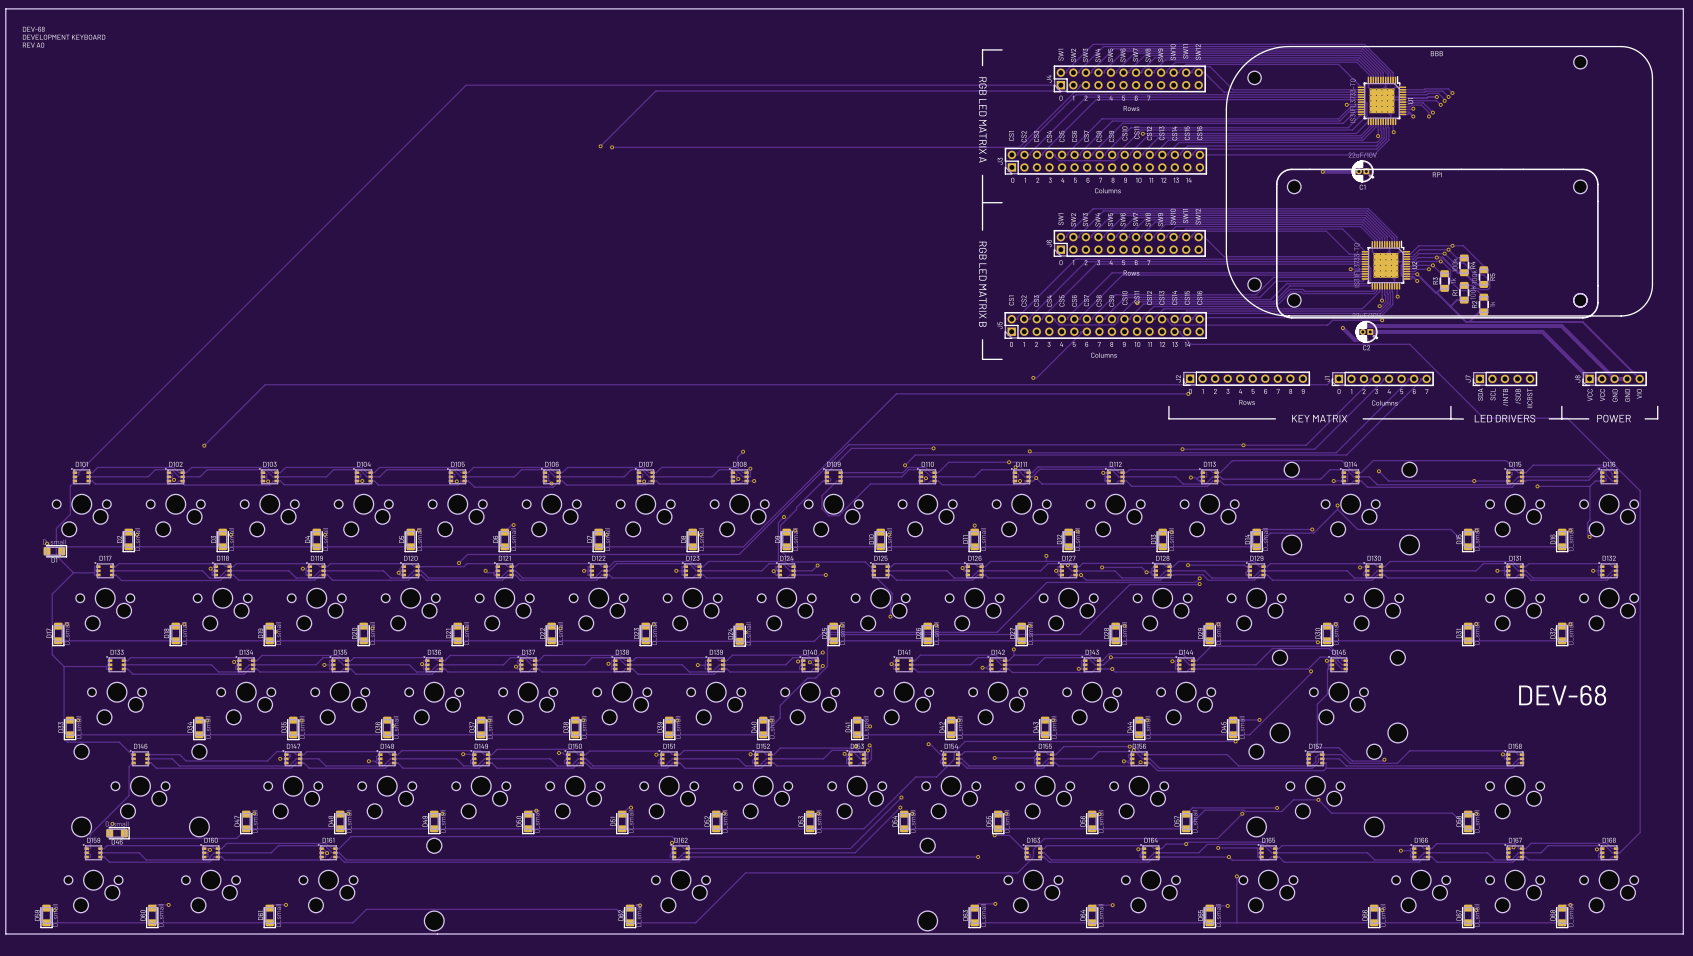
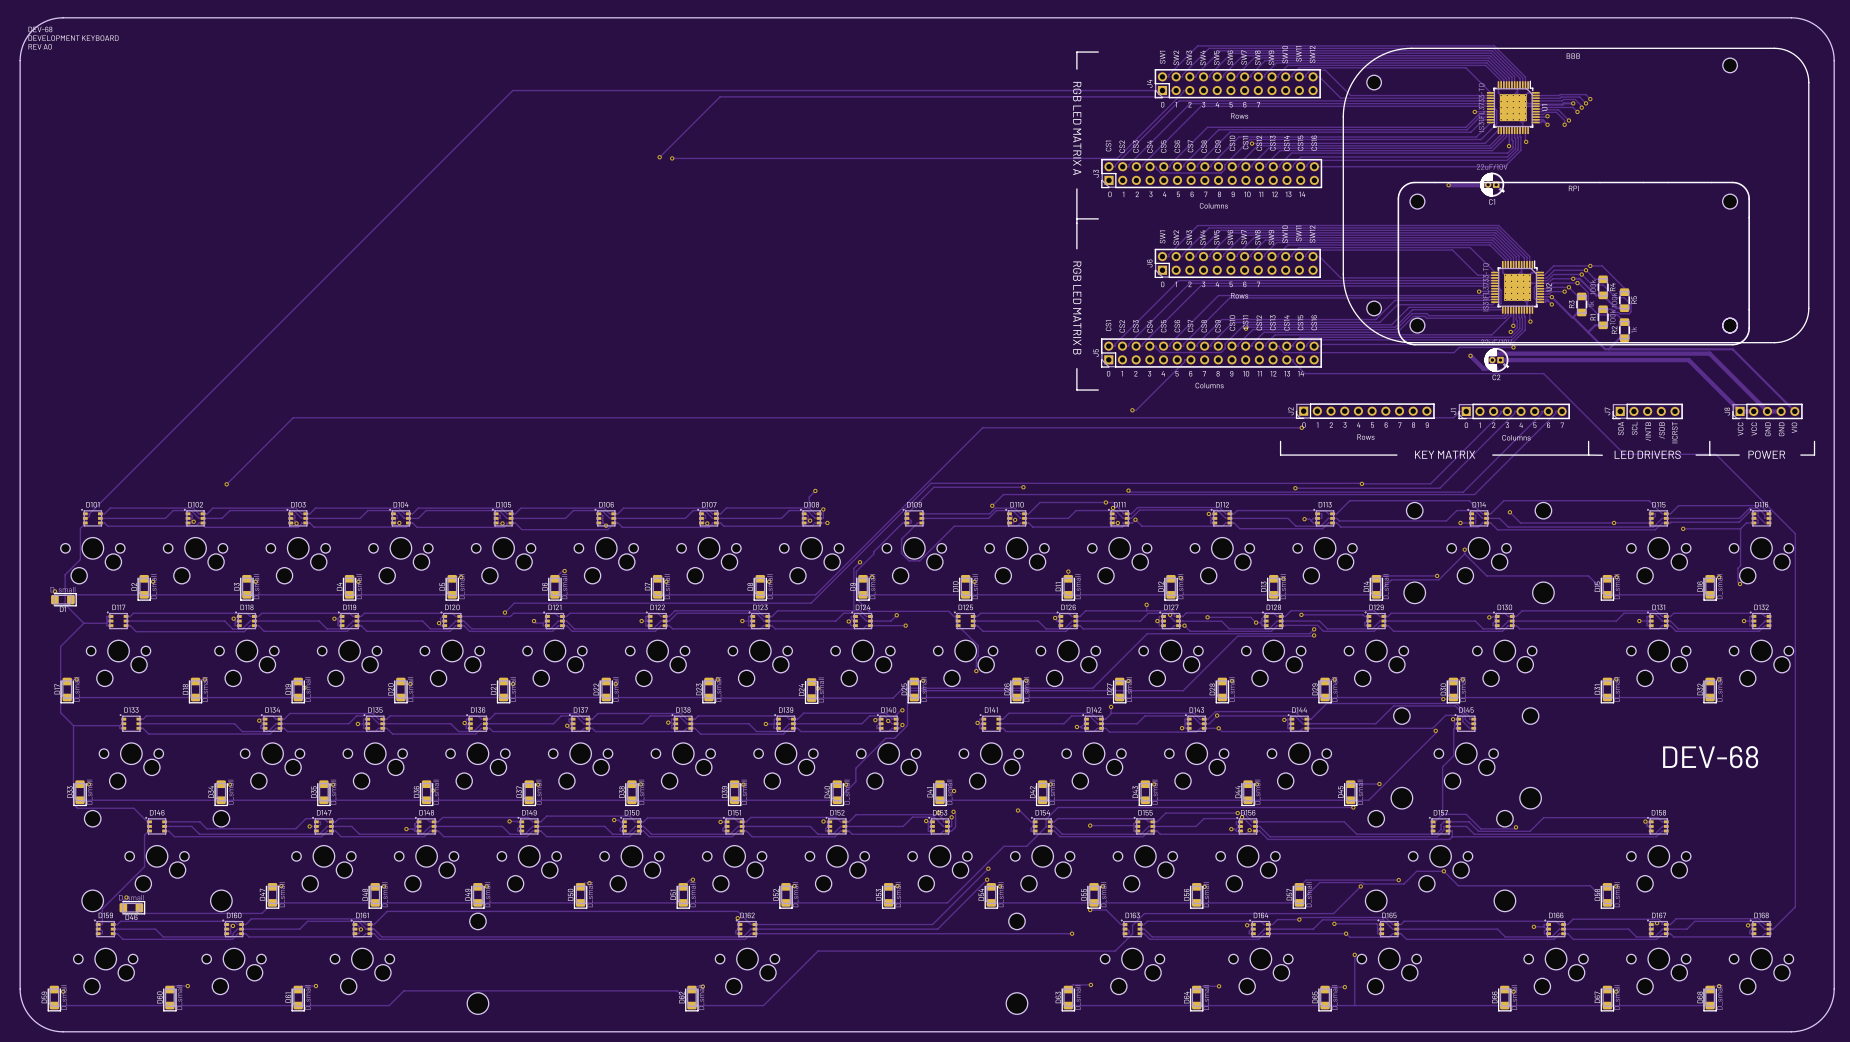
board edge: (5, 8) (1683, 8) (1683, 934) (5, 934) (5, 8) -> (62, 17) (44, 21) (32, 30) (24, 42) (20, 60) (20, 989) (25, 1010) (41, 1026) (62, 1031) (1791, 1031) (1812, 1026) (1828, 1010) (1834, 989) (1834, 60) (1828, 39) (1812, 23) (1791, 17) (62, 17)

